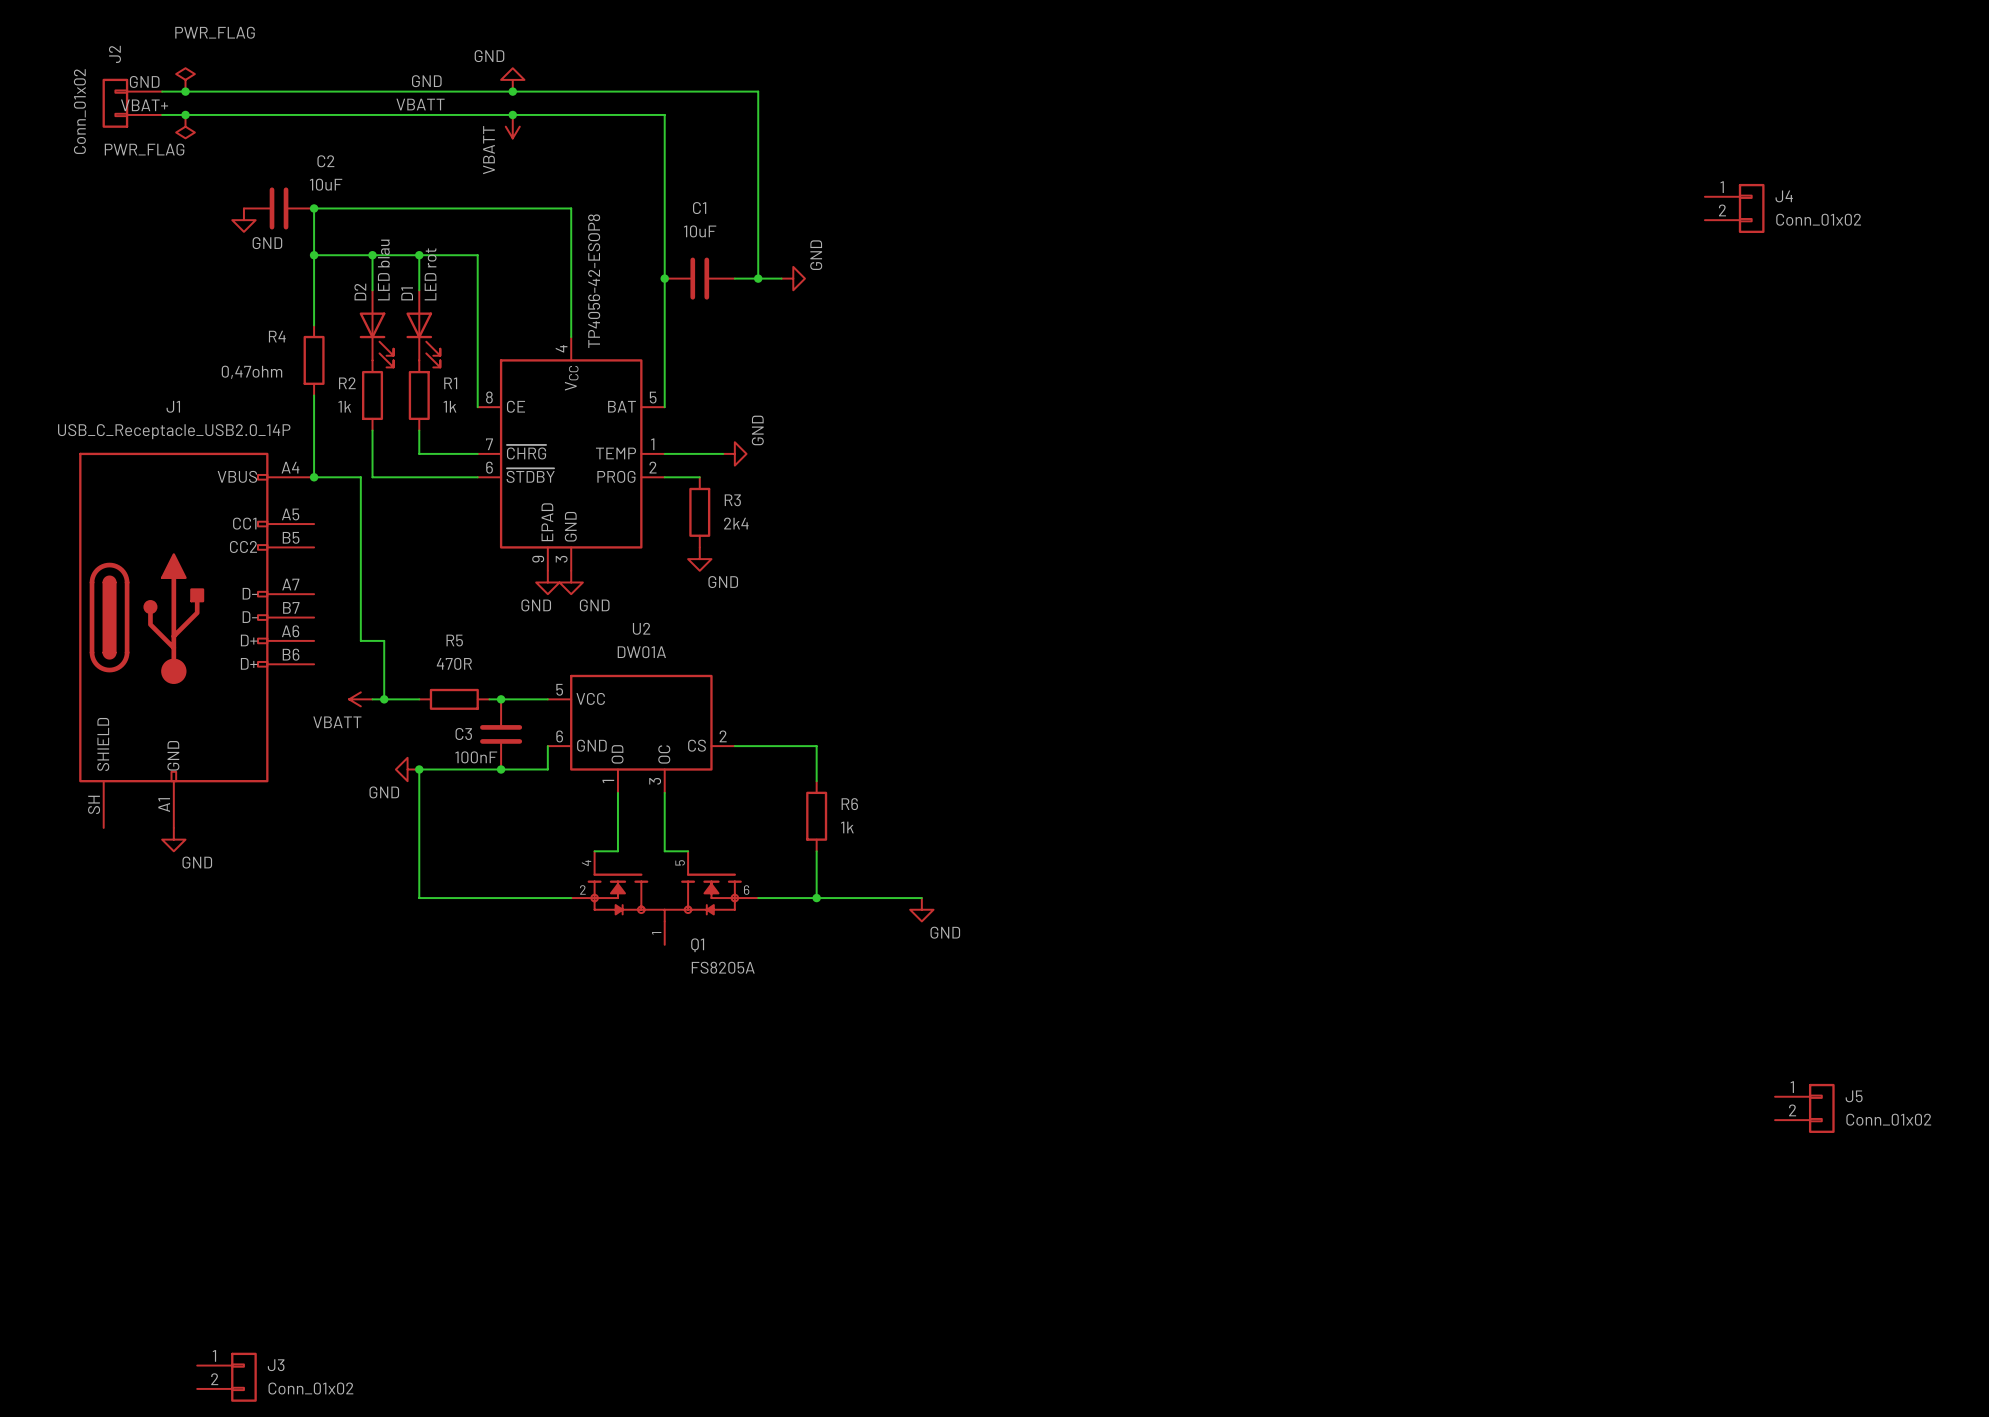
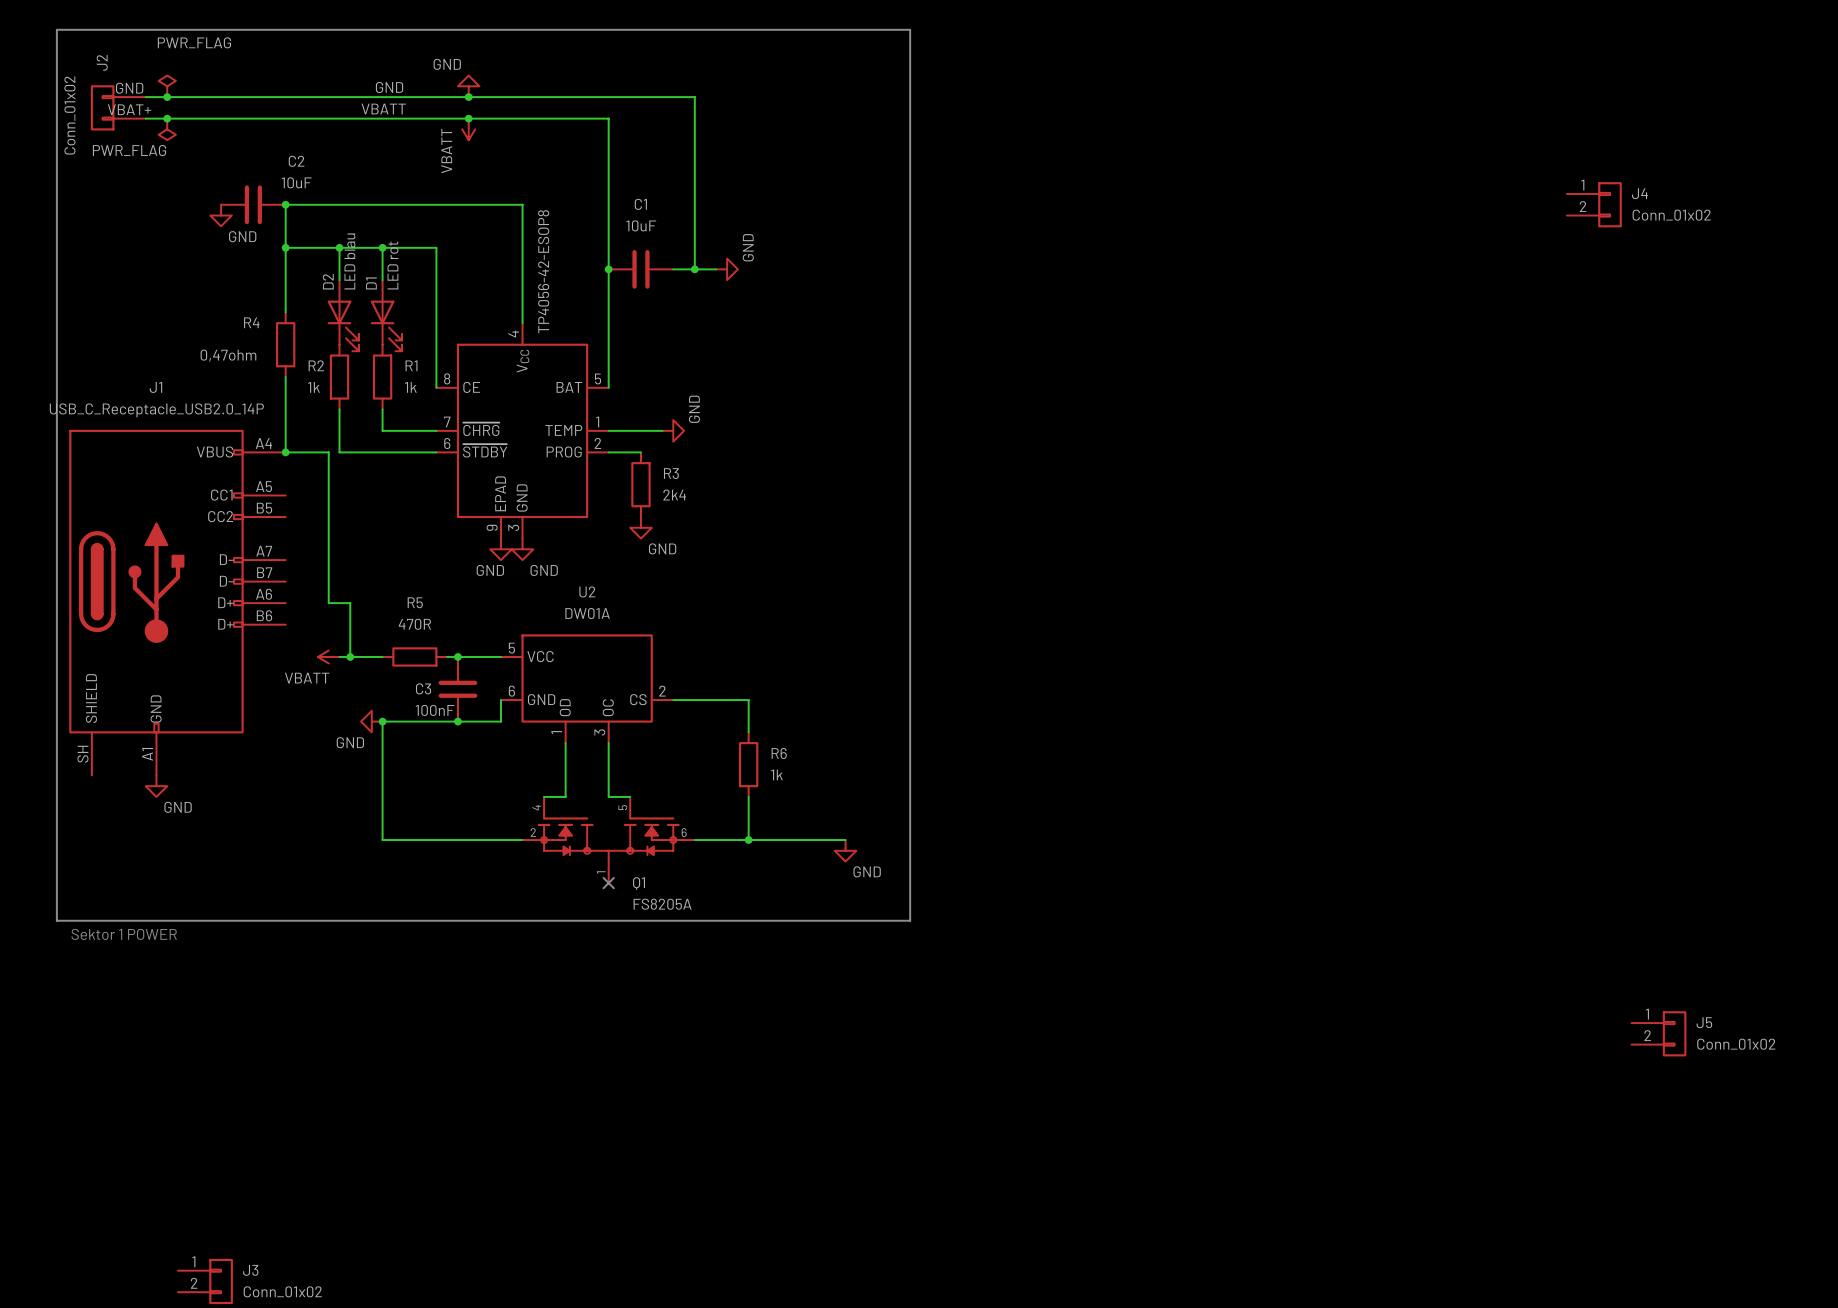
line: none -> (56, 29) (910, 29) (910, 920) (56, 920) (56, 29)
no-connect mark: none -> (608, 883)
text: none -> Sektor 1 POWER (124, 934)

